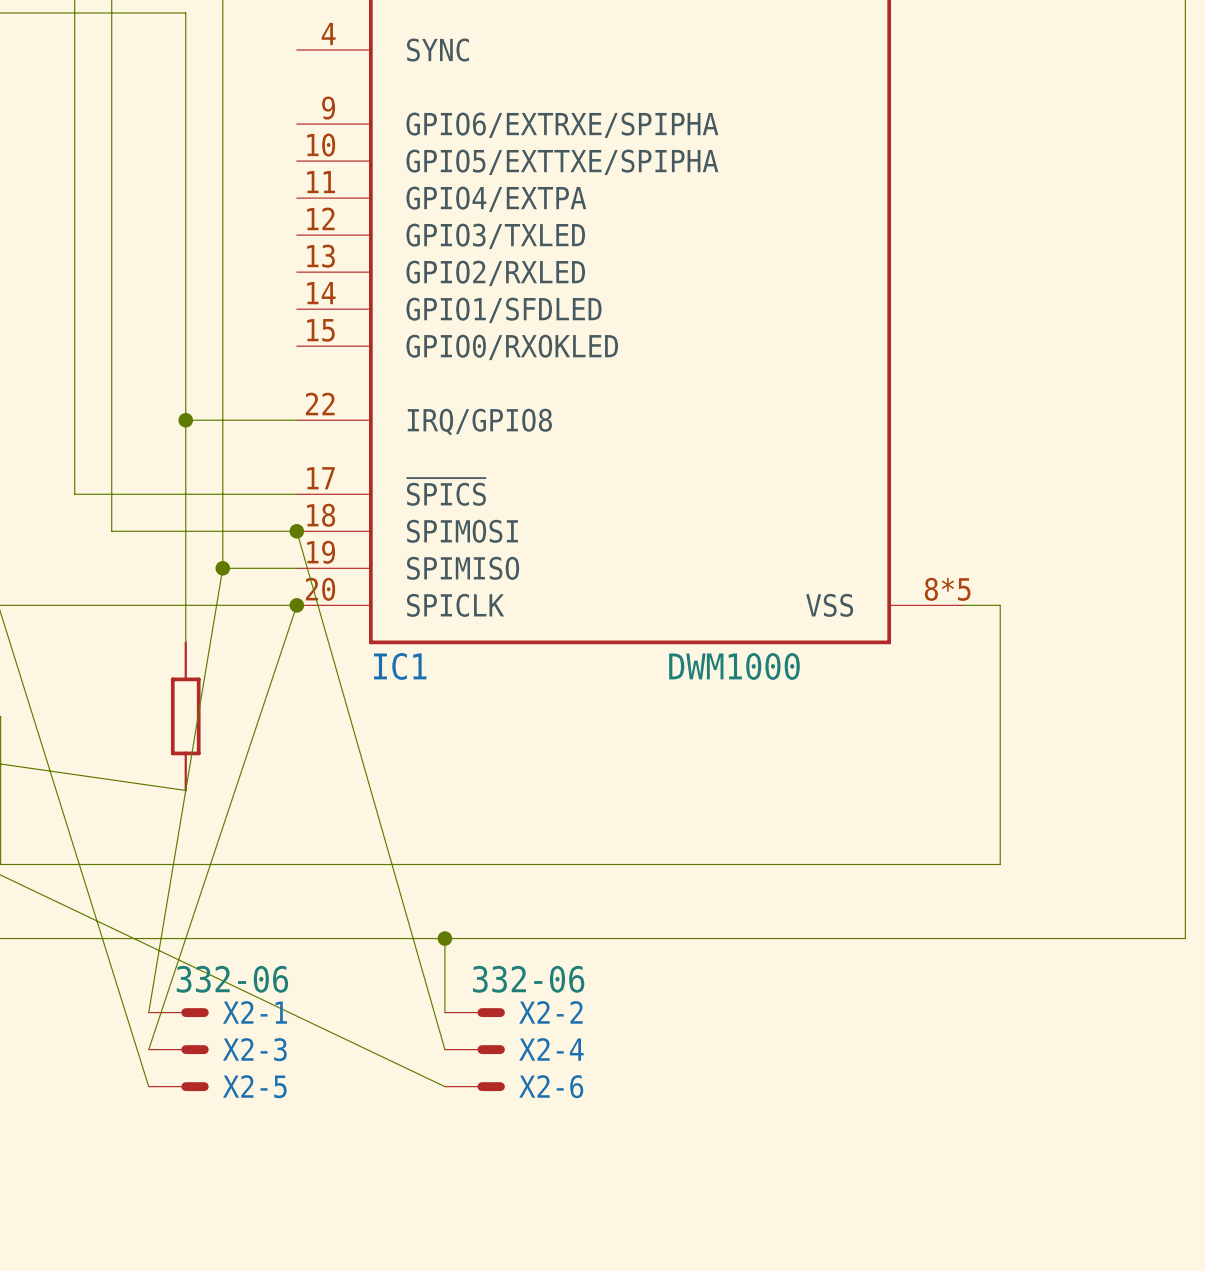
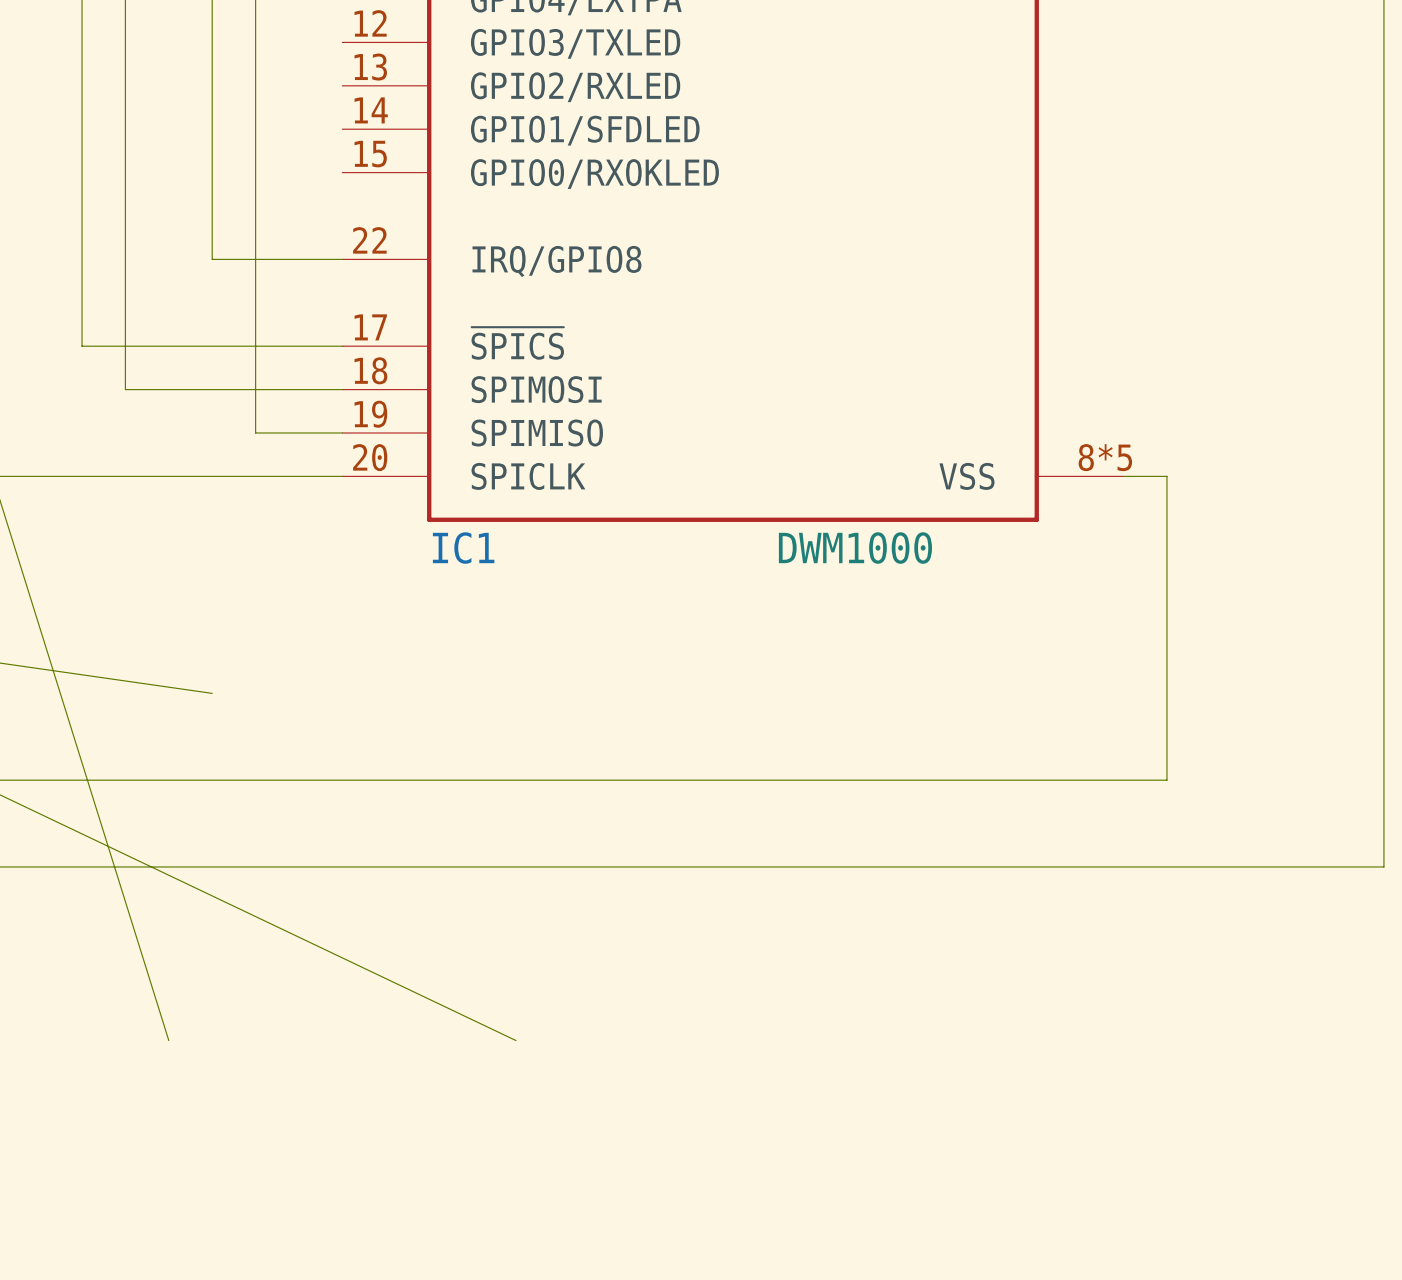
wire: (185, 420) (185, 642) -> none
junction: (185, 420) -> none
wire: (296, 531) (444, 1049) -> none
junction: (296, 531) -> none
wire: (222, 568) (148, 1012) -> none
junction: (222, 568) -> none
wire: (296, 605) (148, 1049) -> none
junction: (296, 605) -> none
part: (185, 716) -> none
wire: (444, 938) (444, 1012) -> none
junction: (444, 938) -> none
X2-1: 332-06 (178, 1012) -> none
X2-2: 332-06 (474, 1012) -> none
X2-3: (178, 1049) -> none
X2-4: (474, 1049) -> none
X2-5: (178, 1086) -> none
X2-6: (474, 1086) -> none

